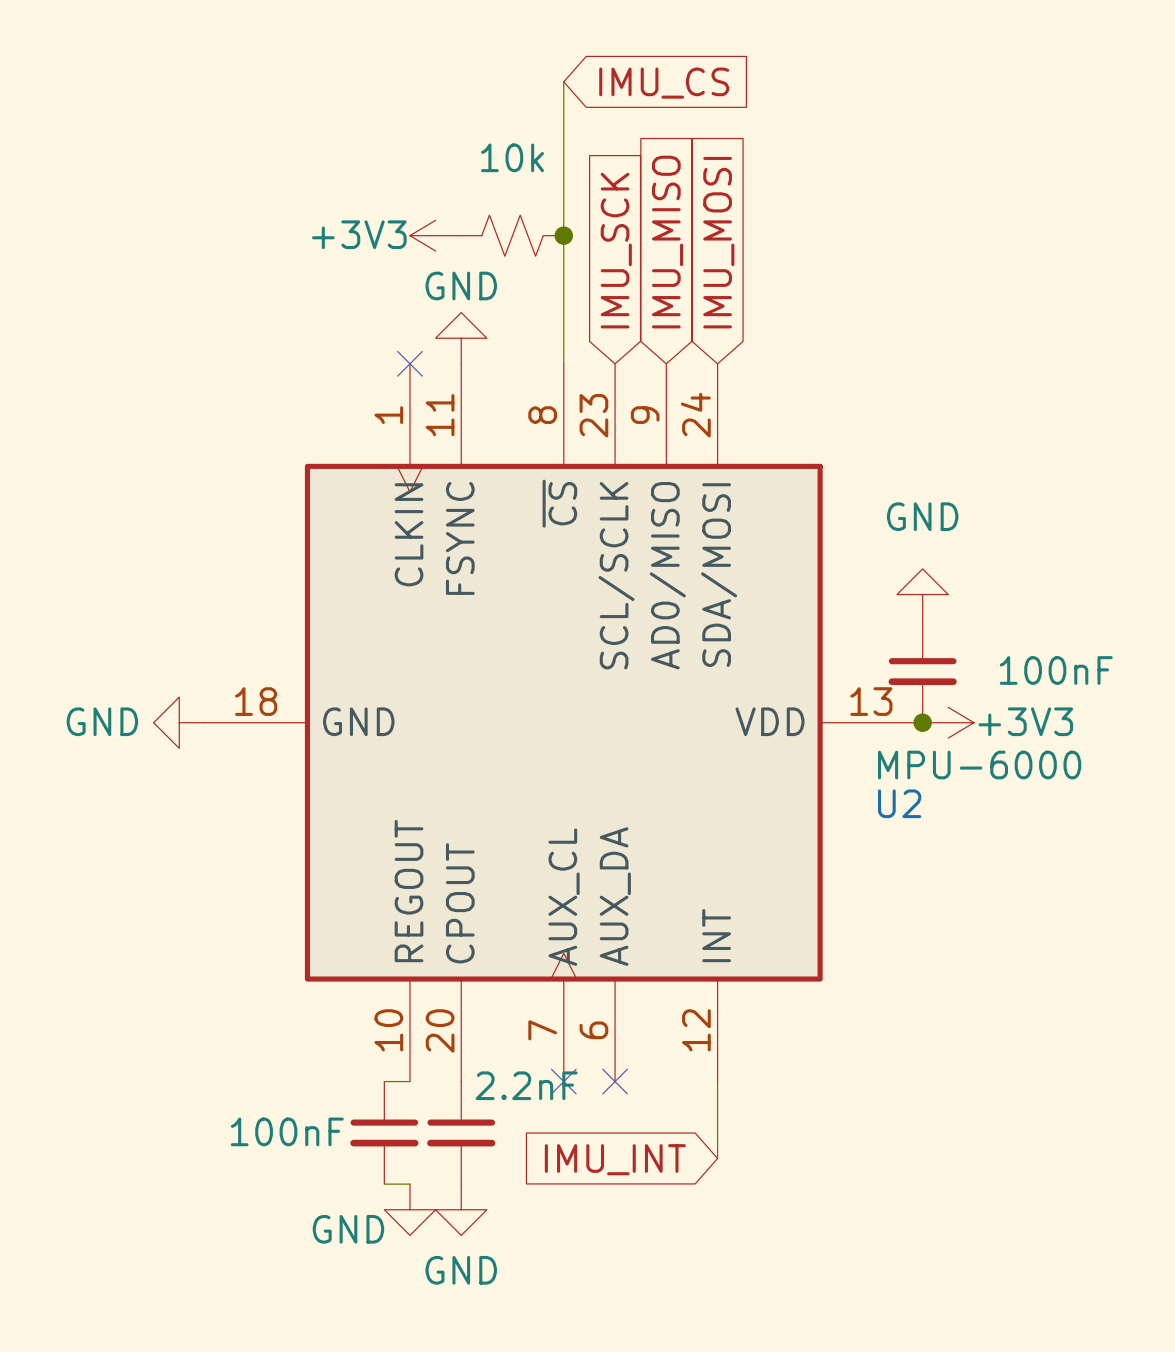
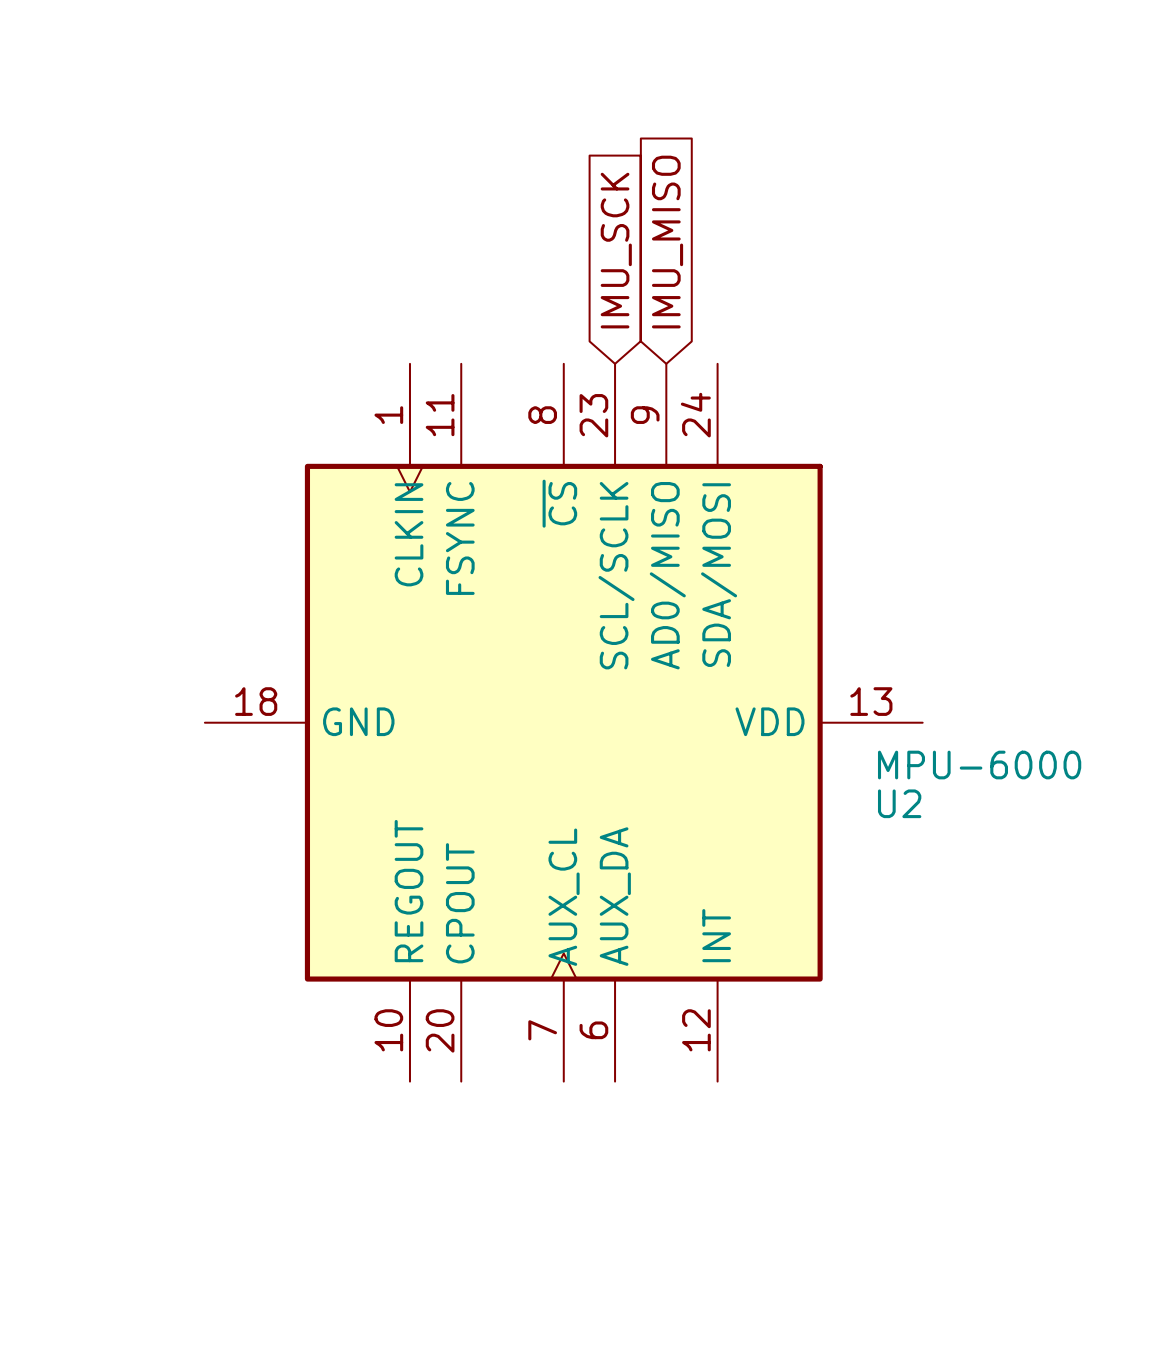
wire: (563, 81) (563, 363) -> none
global label: IMU_CS (664, 83) -> none
power symbol: +3V3 (435, 235) -> none
part: 10k (512, 235) -> none
junction: (563, 235) -> none
global label: IMU_MOSI (718, 242) -> none
power symbol: GND (461, 338) -> none
no-connect mark: (409, 363) -> none
power symbol: GND (922, 594) -> none
part: 100nF (922, 671) -> none
power symbol: GND (179, 722) -> none
junction: (922, 722) -> none
power symbol: +3V3 (948, 722) -> none
wire: (384, 1081) (409, 1081) -> none
no-connect mark: (563, 1081) -> none
no-connect mark: (615, 1081) -> none
wire: (717, 1081) (717, 1158) -> none
part: 100nF (384, 1132) -> none
part: 2.2nF (461, 1132) -> none
global label: IMU_INT (615, 1159) -> none
wire: (384, 1184) (409, 1184) -> none
power symbol: GND (409, 1209) -> none
power symbol: GND (461, 1209) -> none

